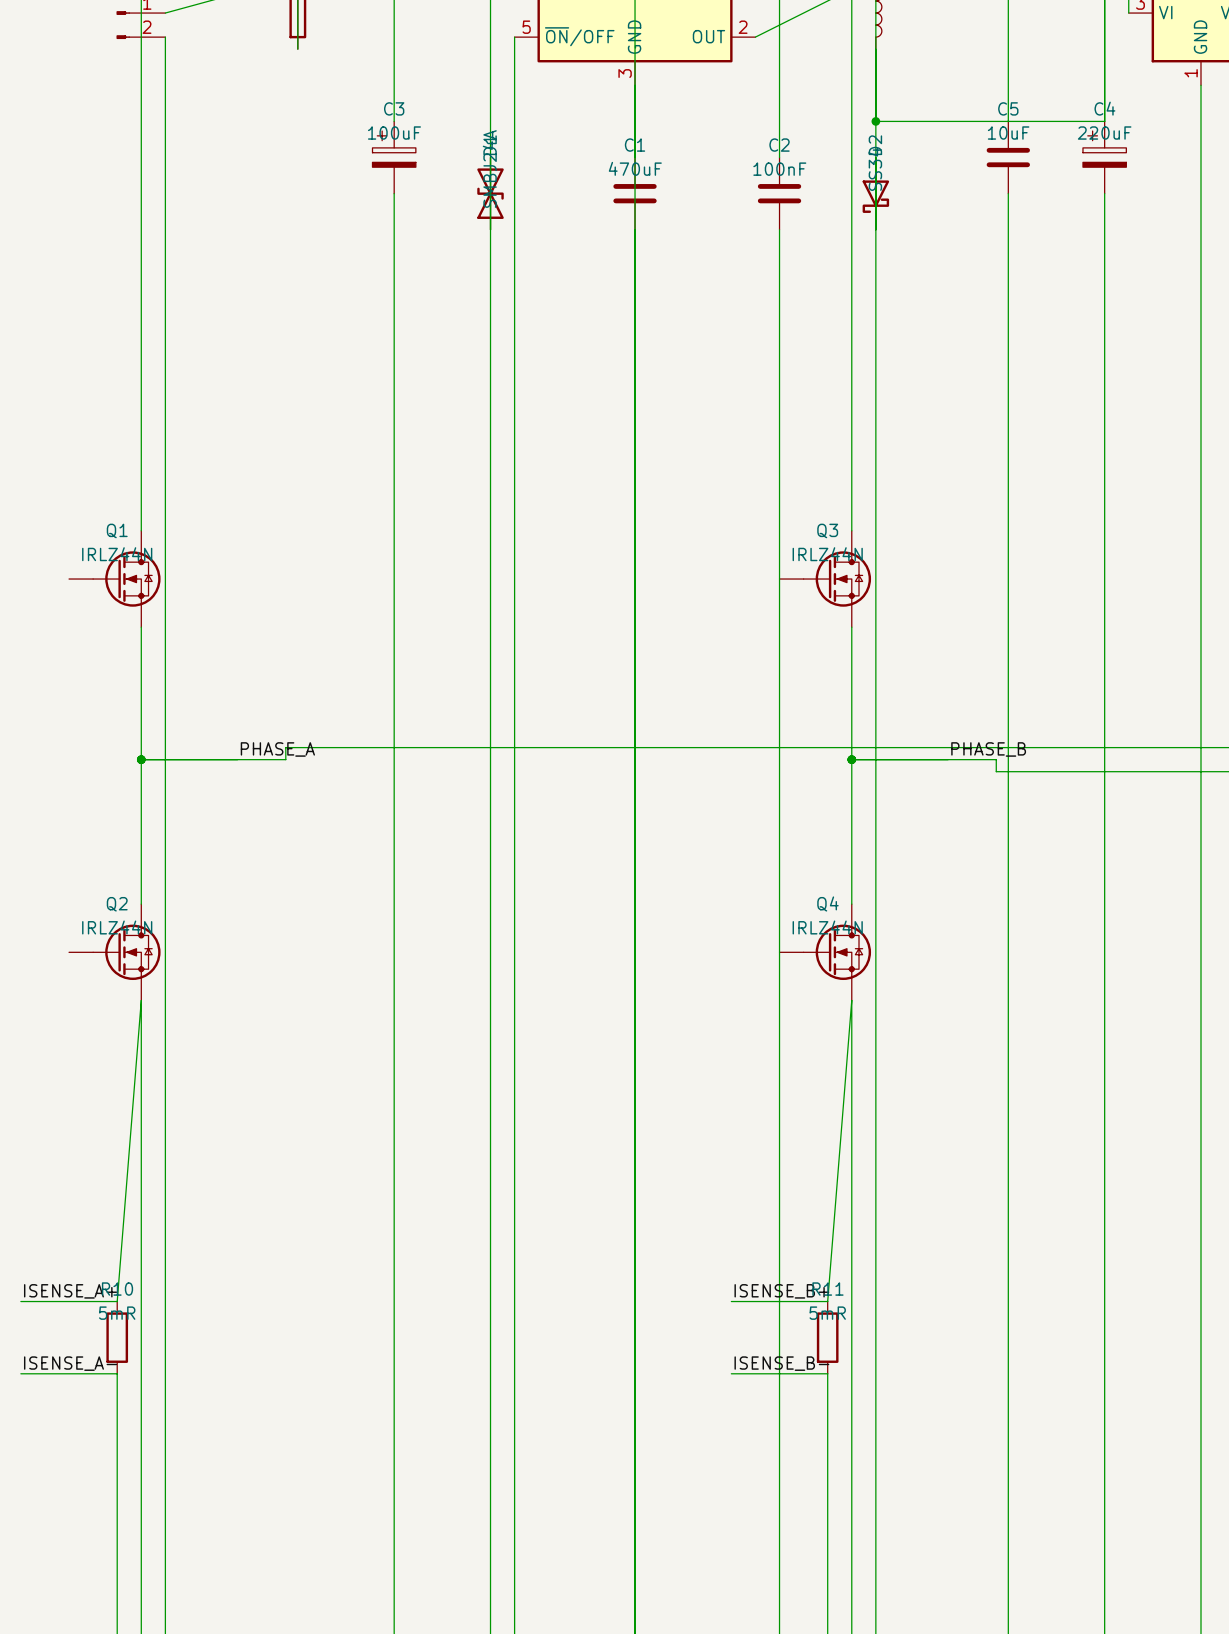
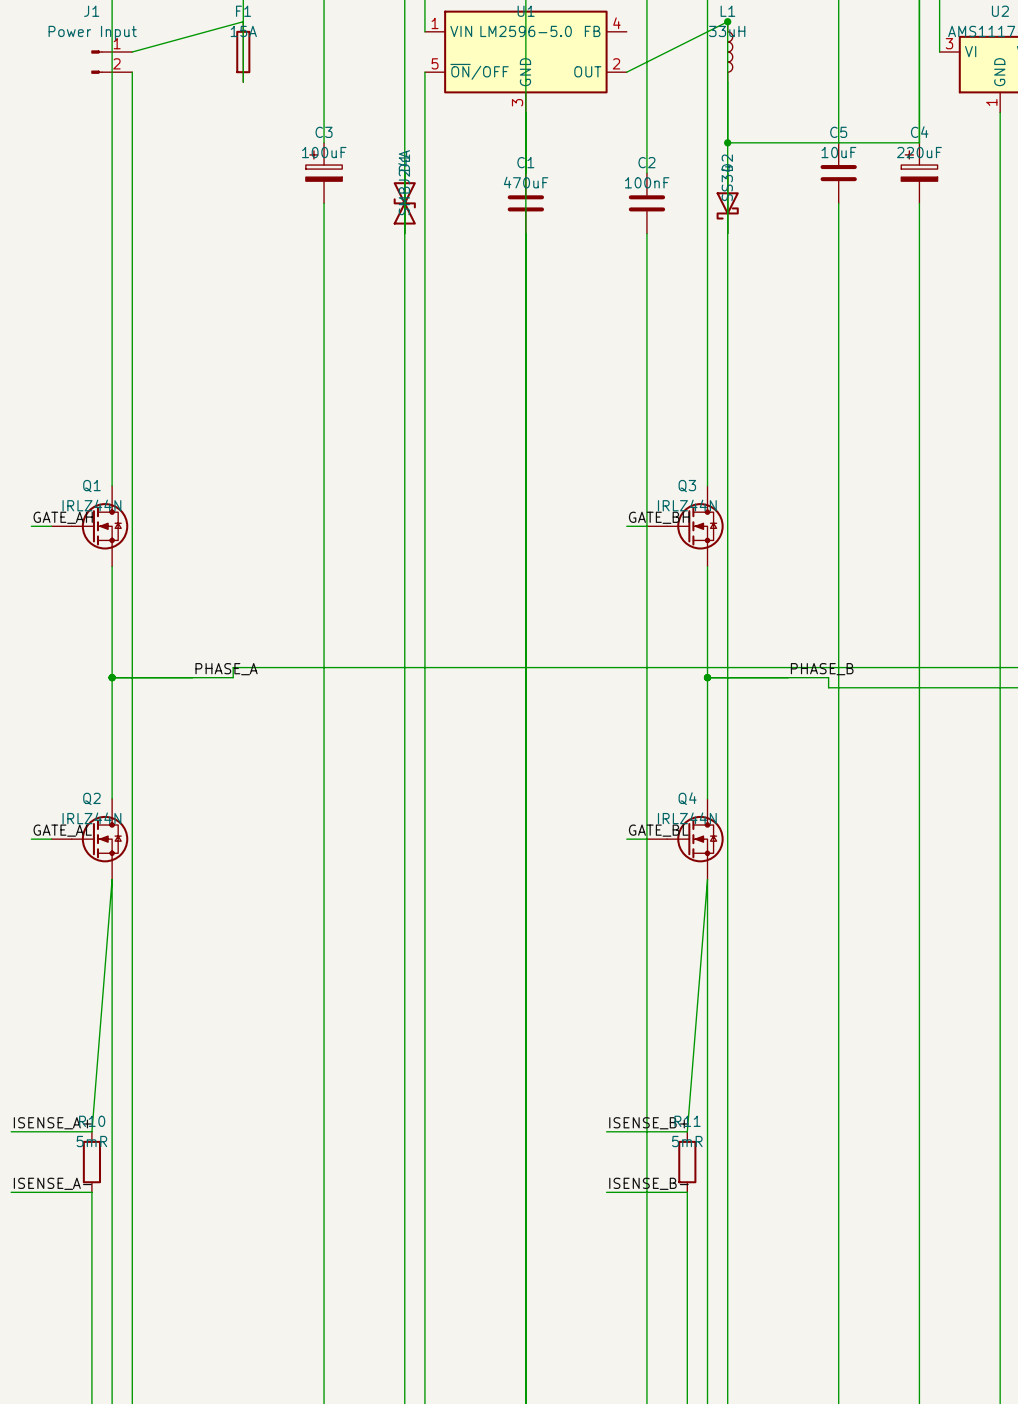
label: none -> GATE_AH (63, 517)
label: none -> GATE_BH (659, 517)
wire: none -> (31, 526) (51, 526)
wire: none -> (626, 526) (646, 526)
label: none -> GATE_AL (62, 830)
label: none -> GATE_BL (658, 830)
wire: none -> (31, 839) (51, 839)
wire: none -> (626, 839) (646, 839)

